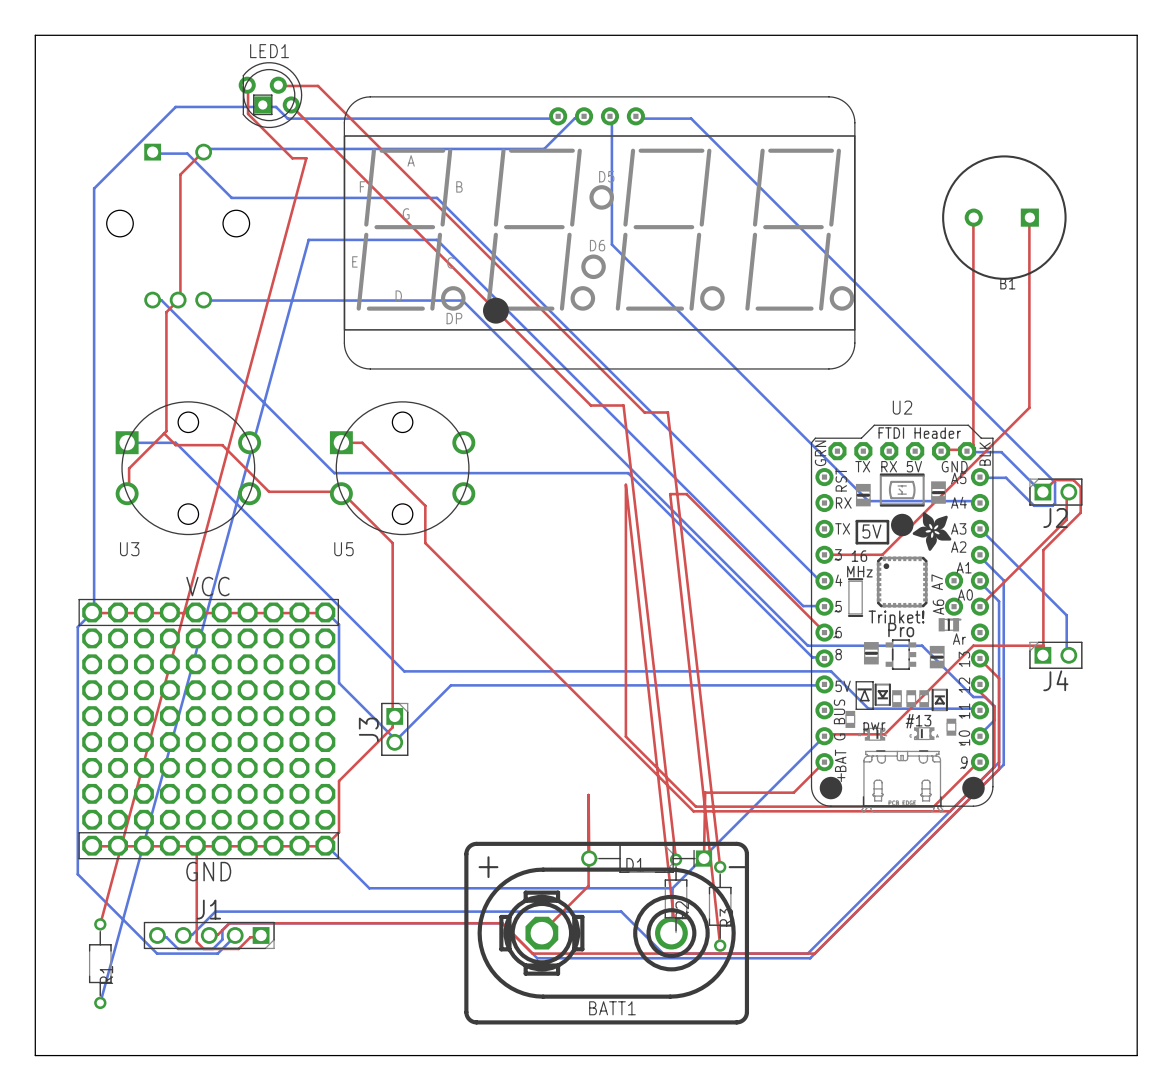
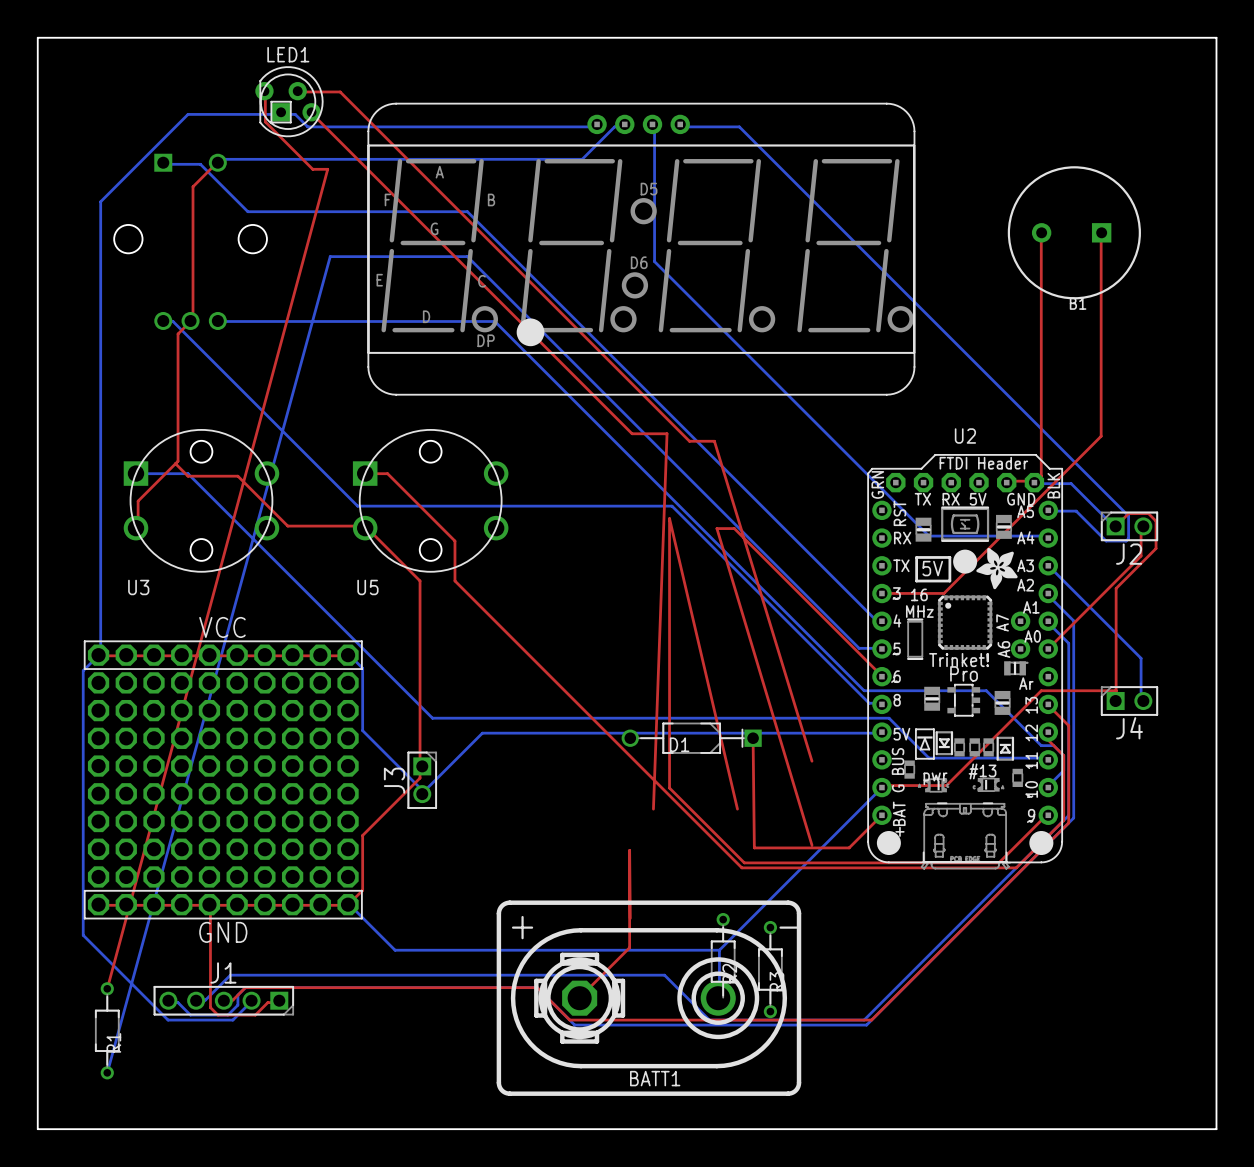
top track: (623, 405) (676, 859) -> (667, 433) (653, 809)
top track: (667, 412) (720, 867) -> (714, 441) (811, 761)
top track: (625, 484) (676, 938) -> (669, 518) (737, 809)
top track: (670, 494) (720, 945) -> (716, 528) (811, 845)
top track: (705, 792) (703, 858) -> (754, 847) (753, 738)
D1 position: (646, 858) -> (691, 738)

